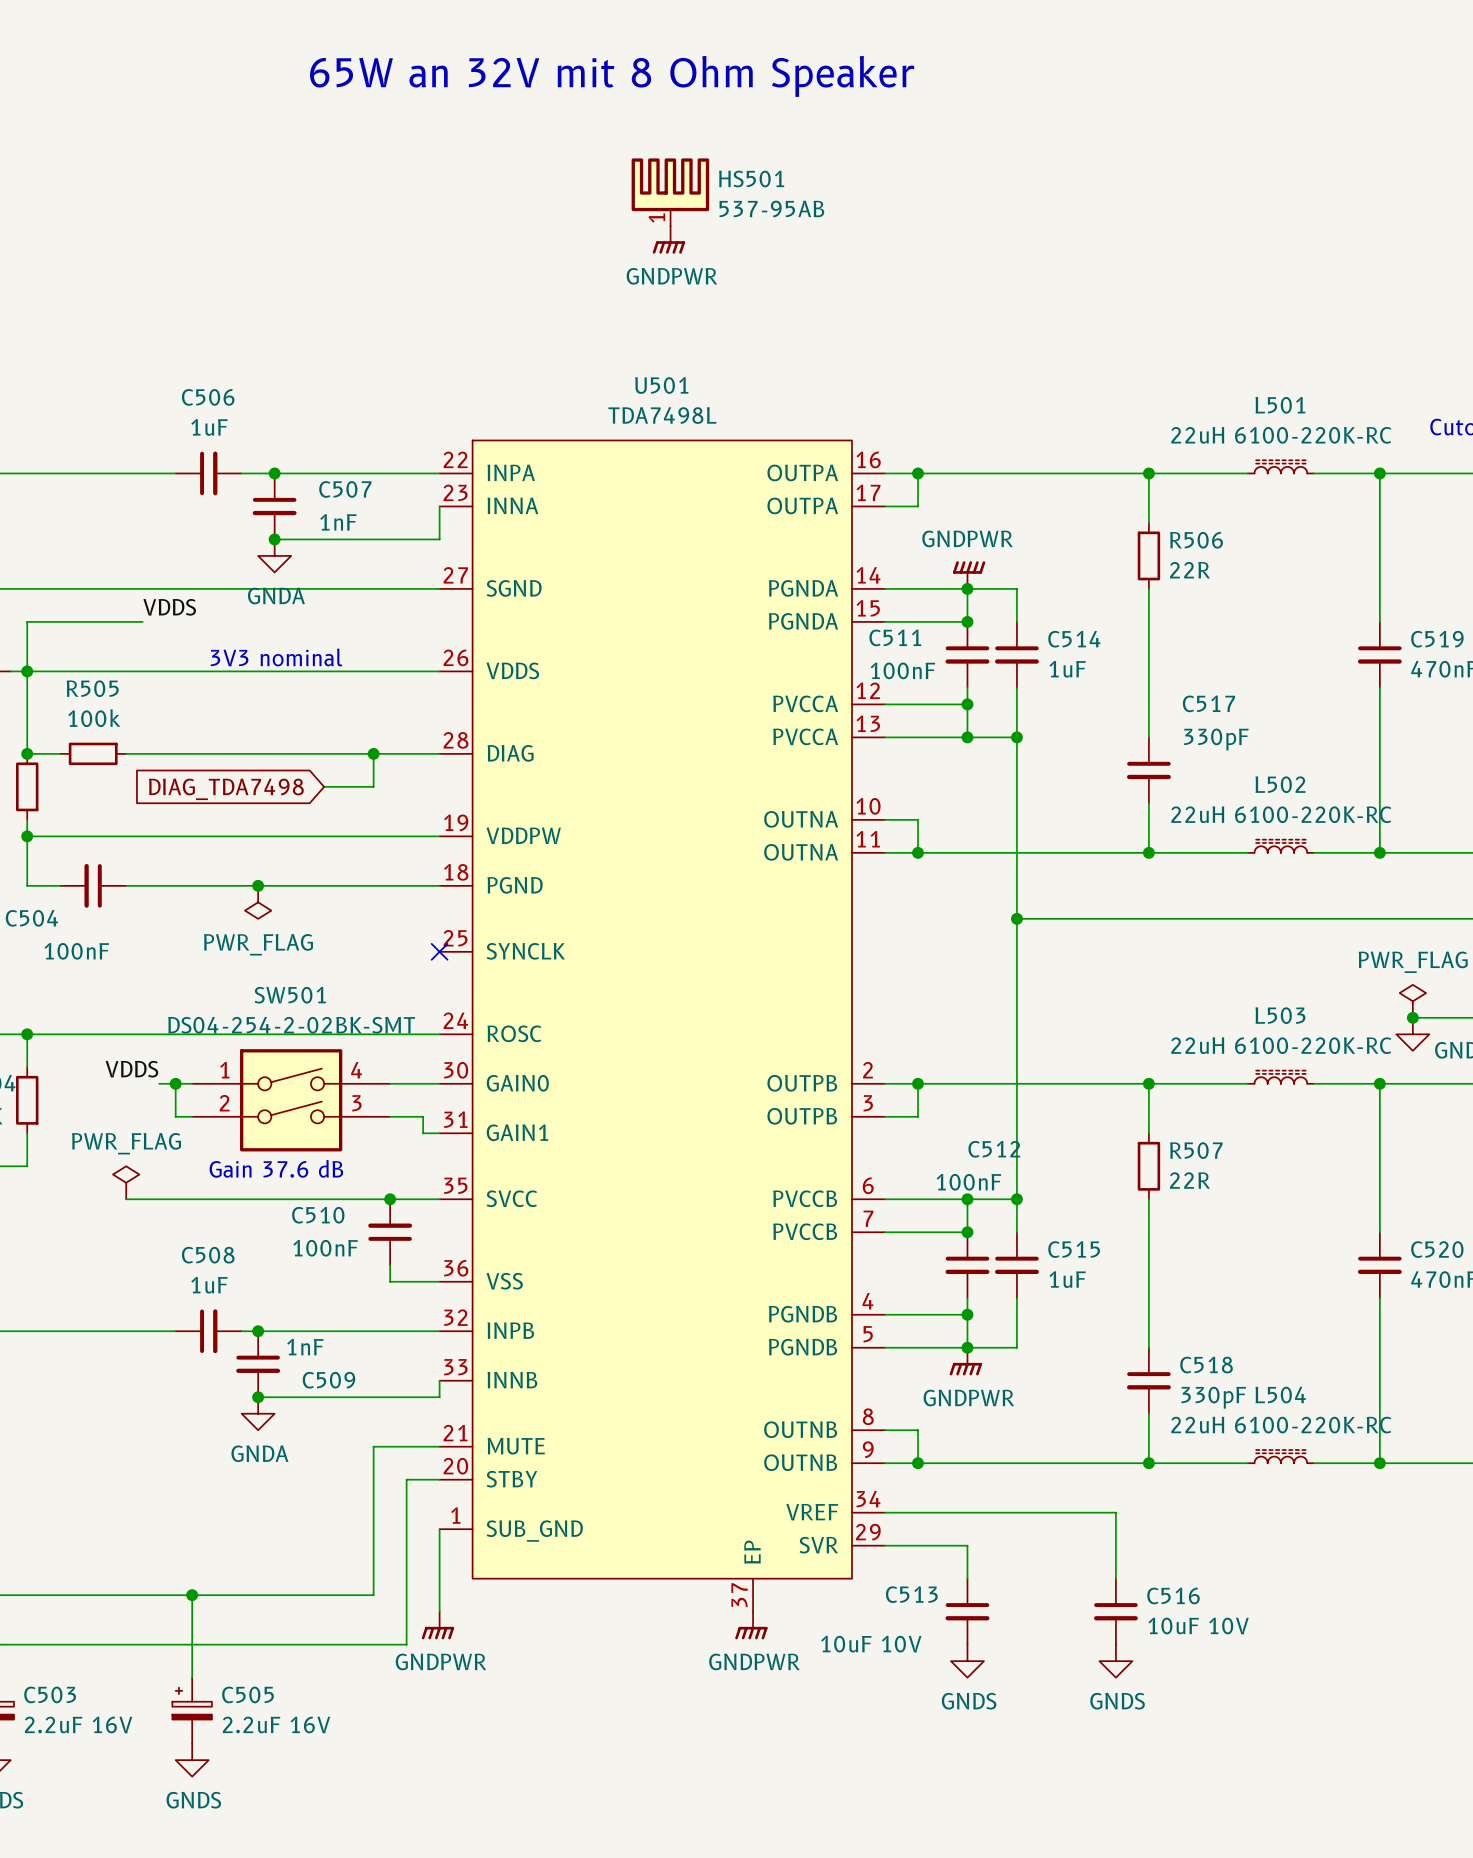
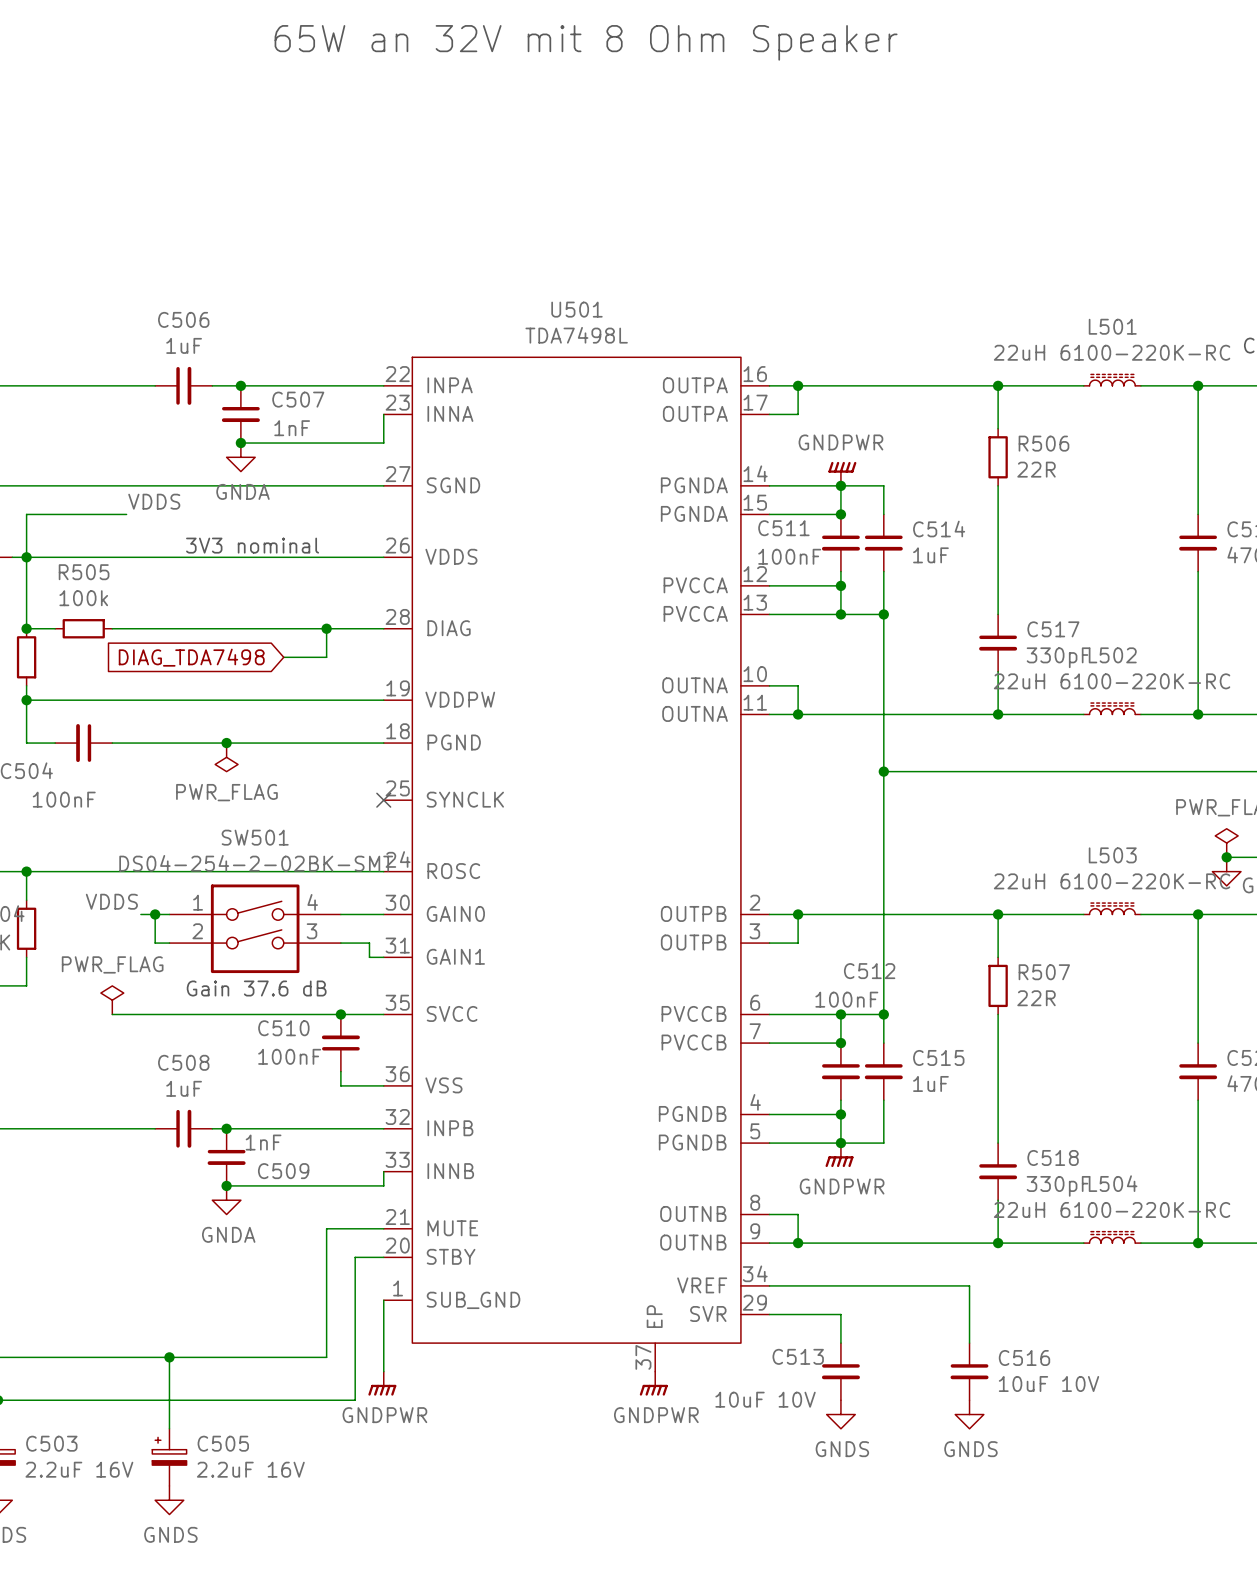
HS501: 537-95AB (670, 192) -> none
power symbol: GNDPWR (668, 239) -> none
C517 name position: C517 (1208, 703) -> C517 (1053, 629)
C517 value position: 330pF (1216, 739) -> 330pF (1058, 657)

